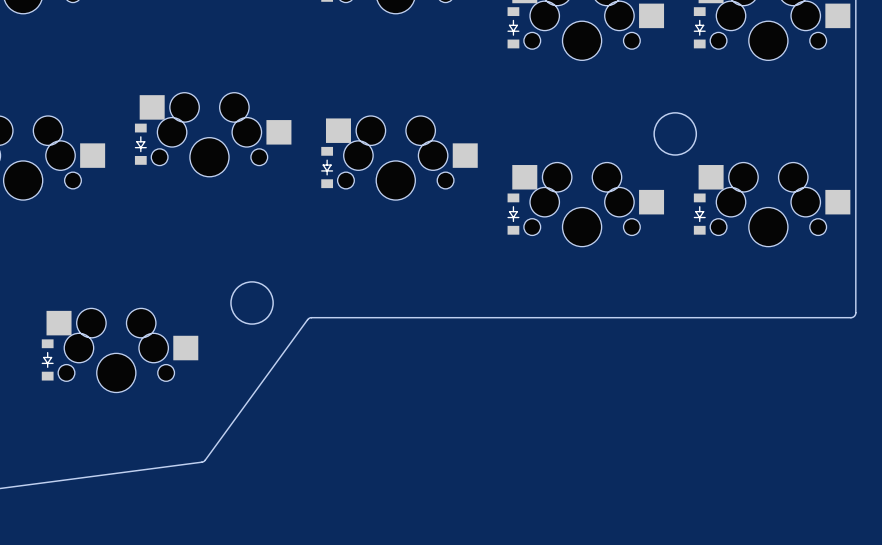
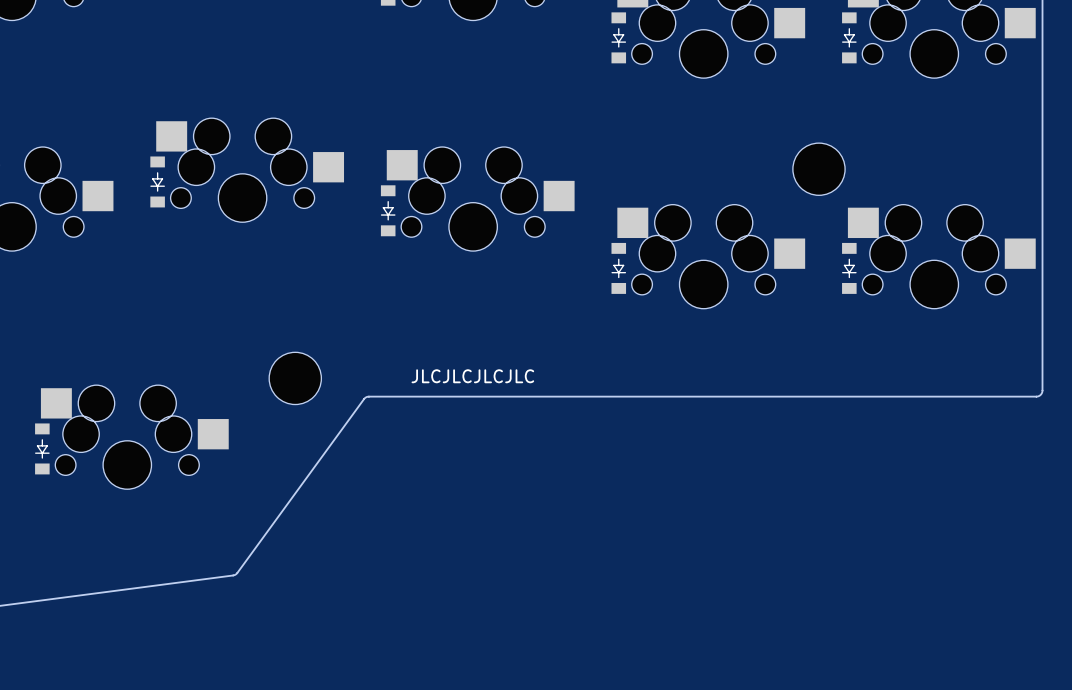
round board edge: [653, 112, 698, 156] -> none
part: none -> (818, 169)
round board edge: [230, 281, 274, 325] -> none
text: none -> JLCJLCJLCJLC (472, 376)
part: none -> (295, 378)

